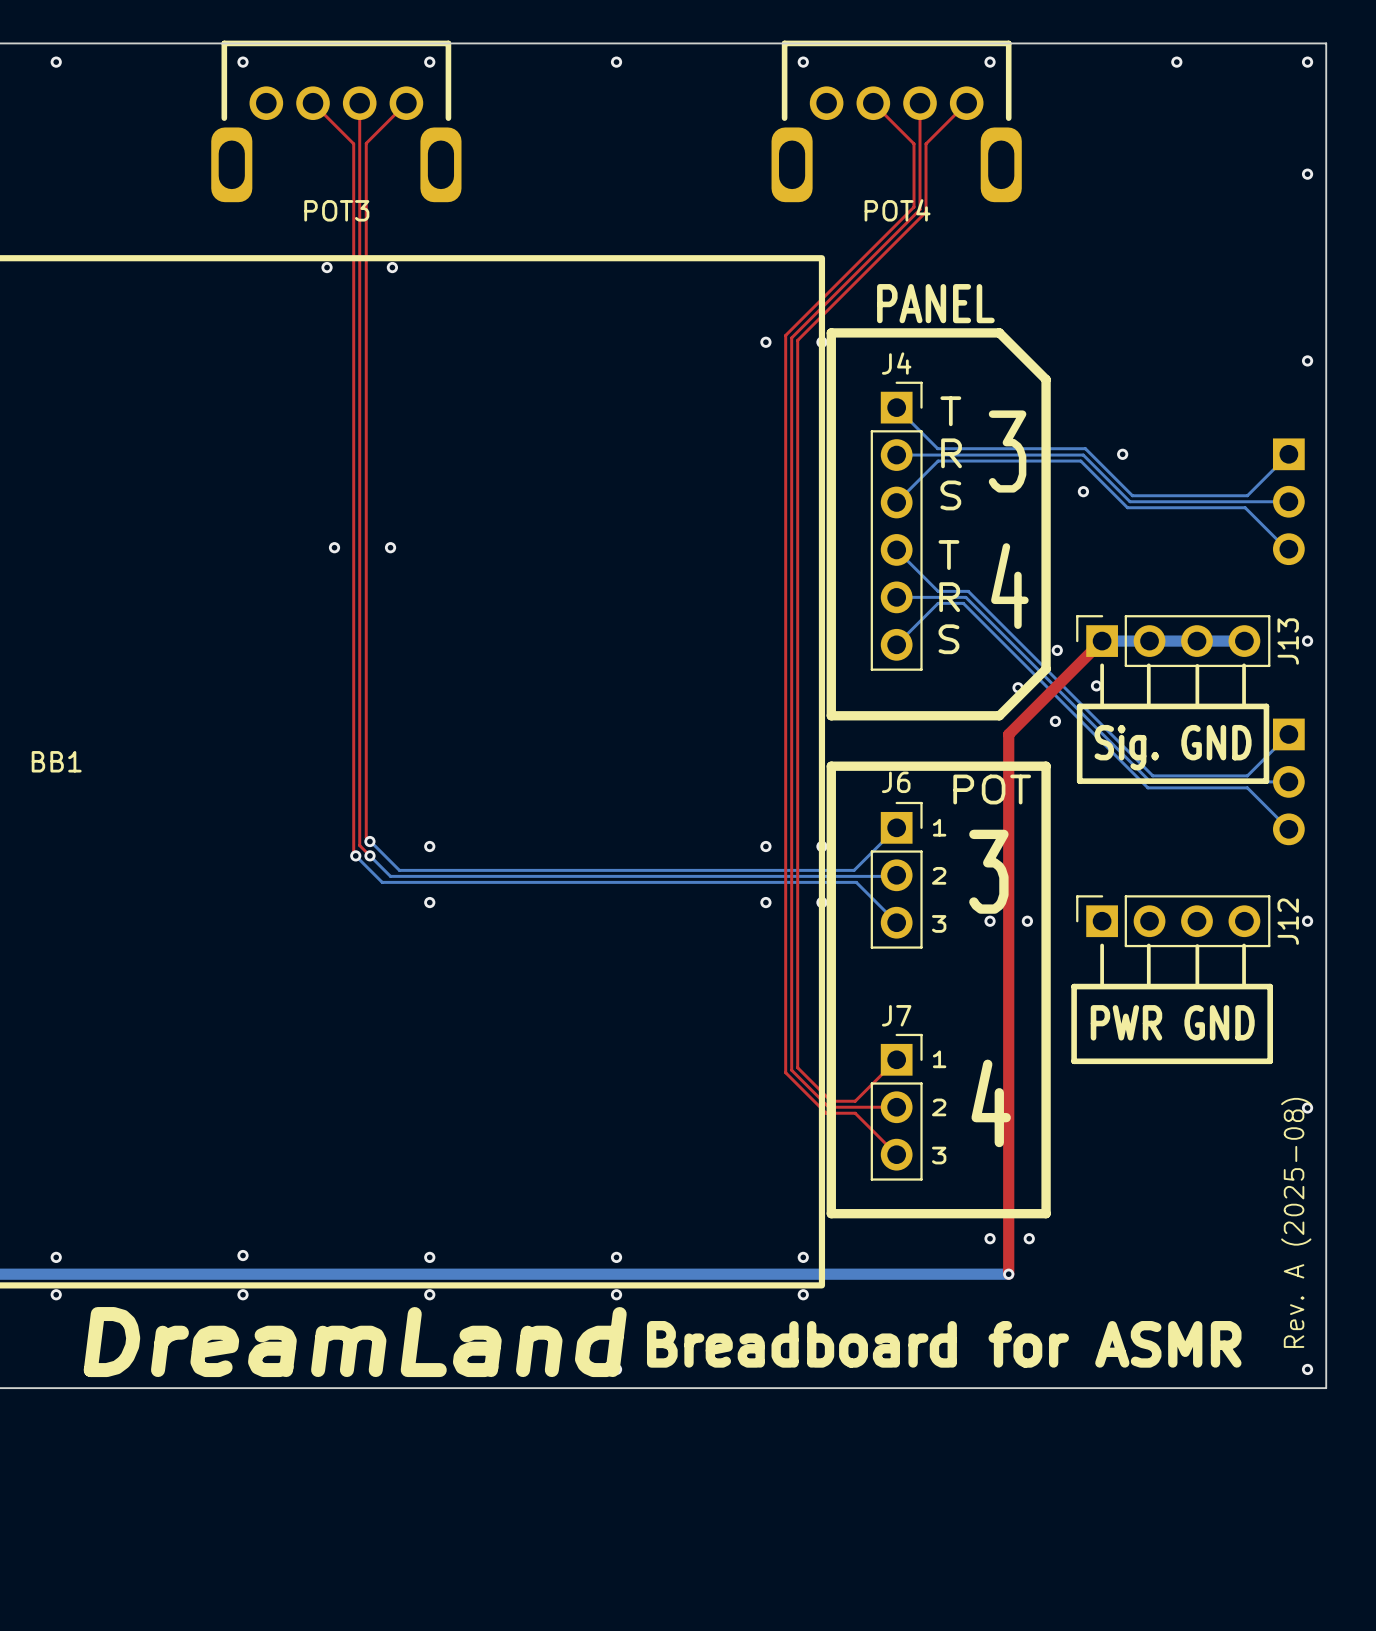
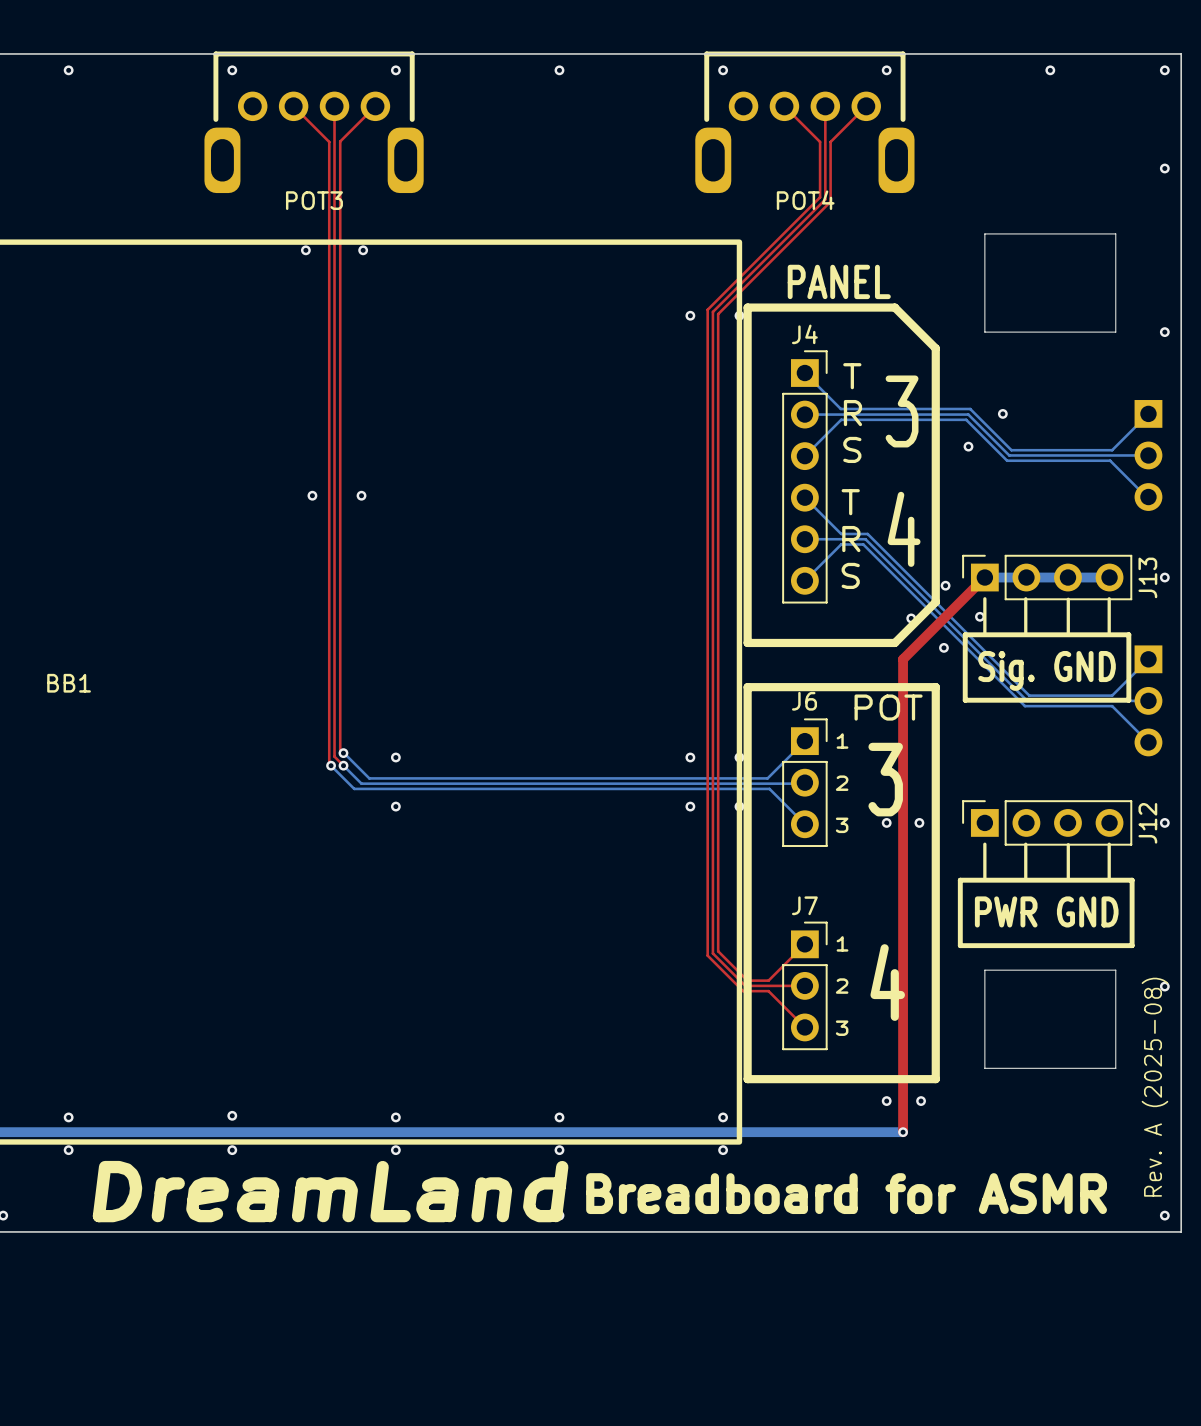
board edge: none -> (984, 233) (984, 332) (1115, 332) (1115, 233) (984, 233)
board edge: none -> (984, 970) (1115, 970) (1115, 1068) (984, 1068) (984, 970)

